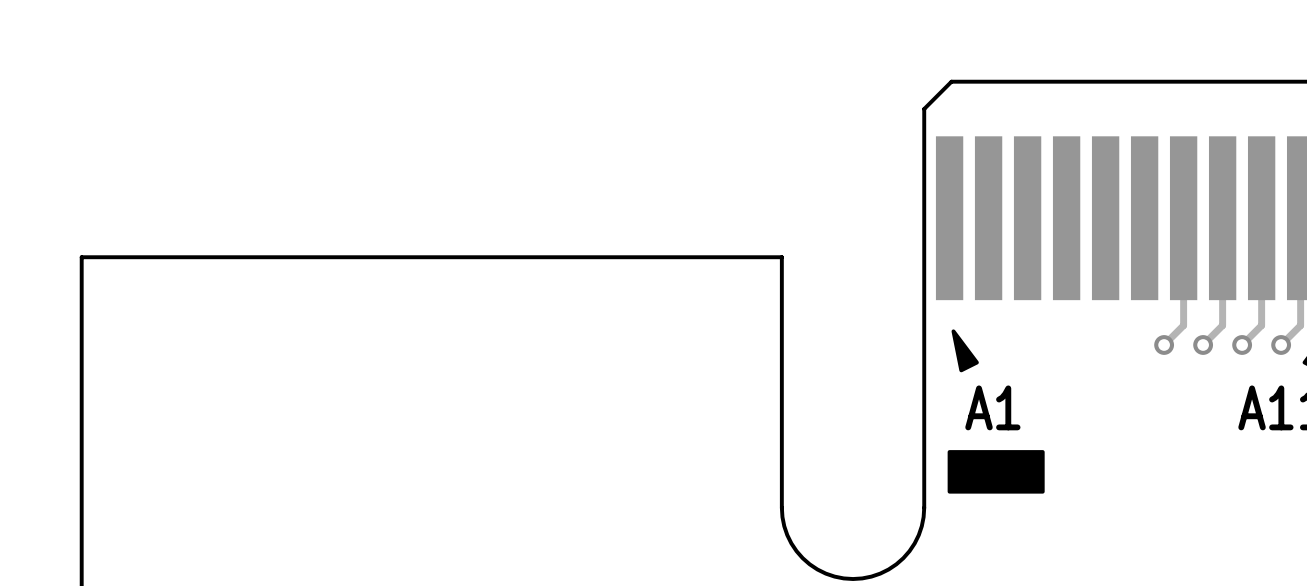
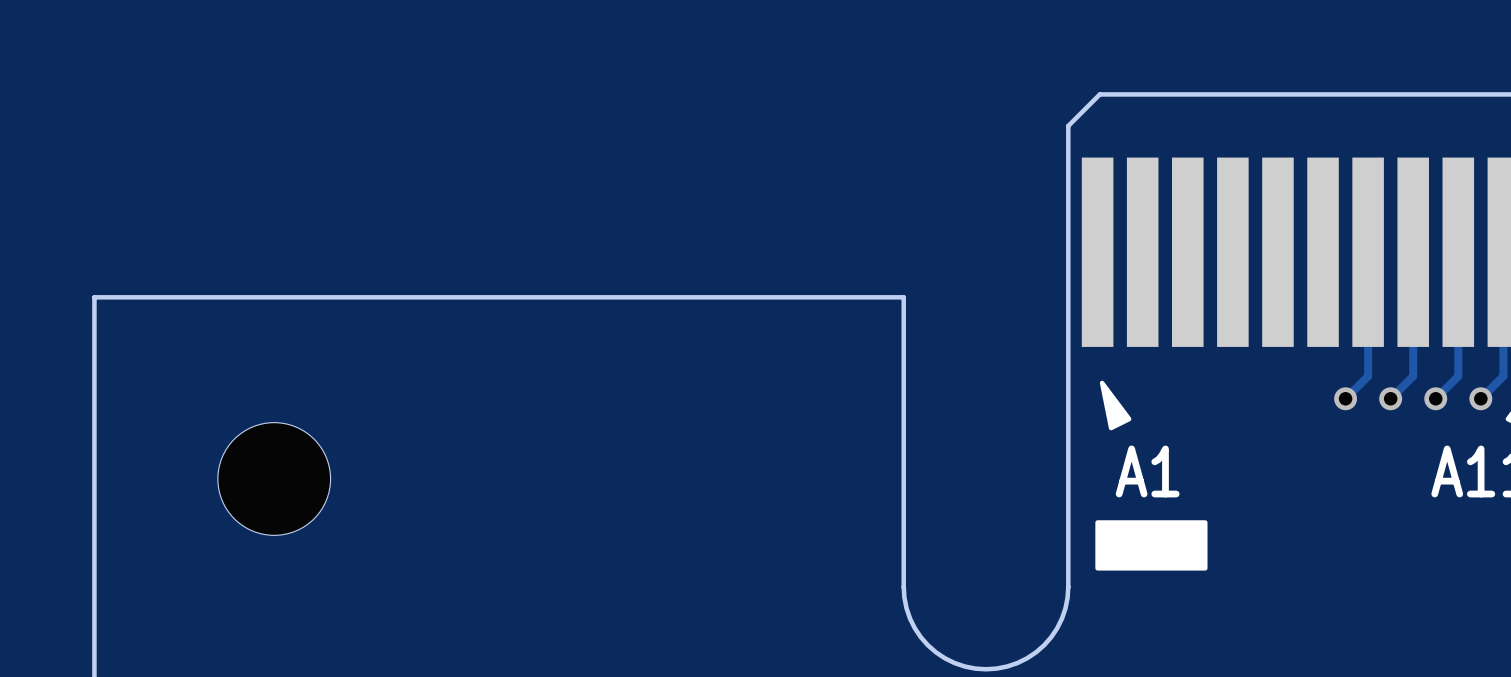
part: none -> (274, 478)

